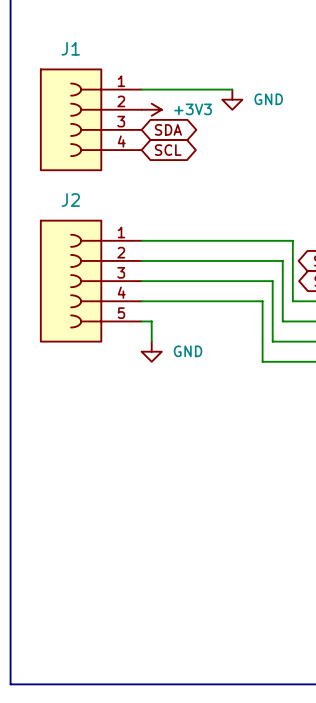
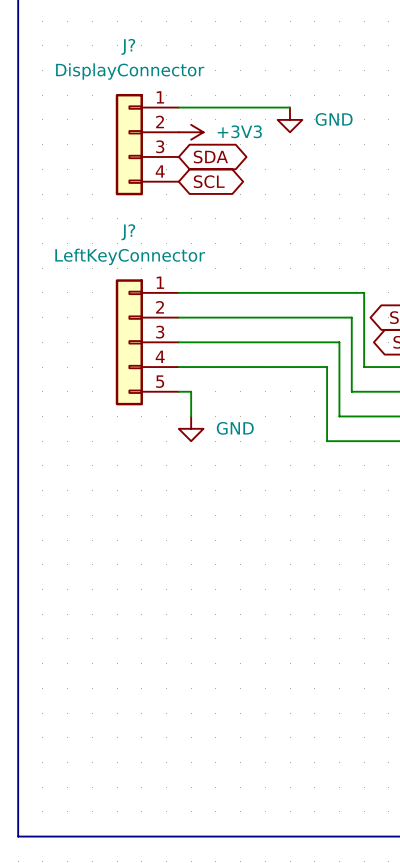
J1: (91, 119) -> none
J?: none -> DisplayConnector (147, 144)
J2: (91, 281) -> none
J?: none -> LeftKeyConnector (147, 342)

